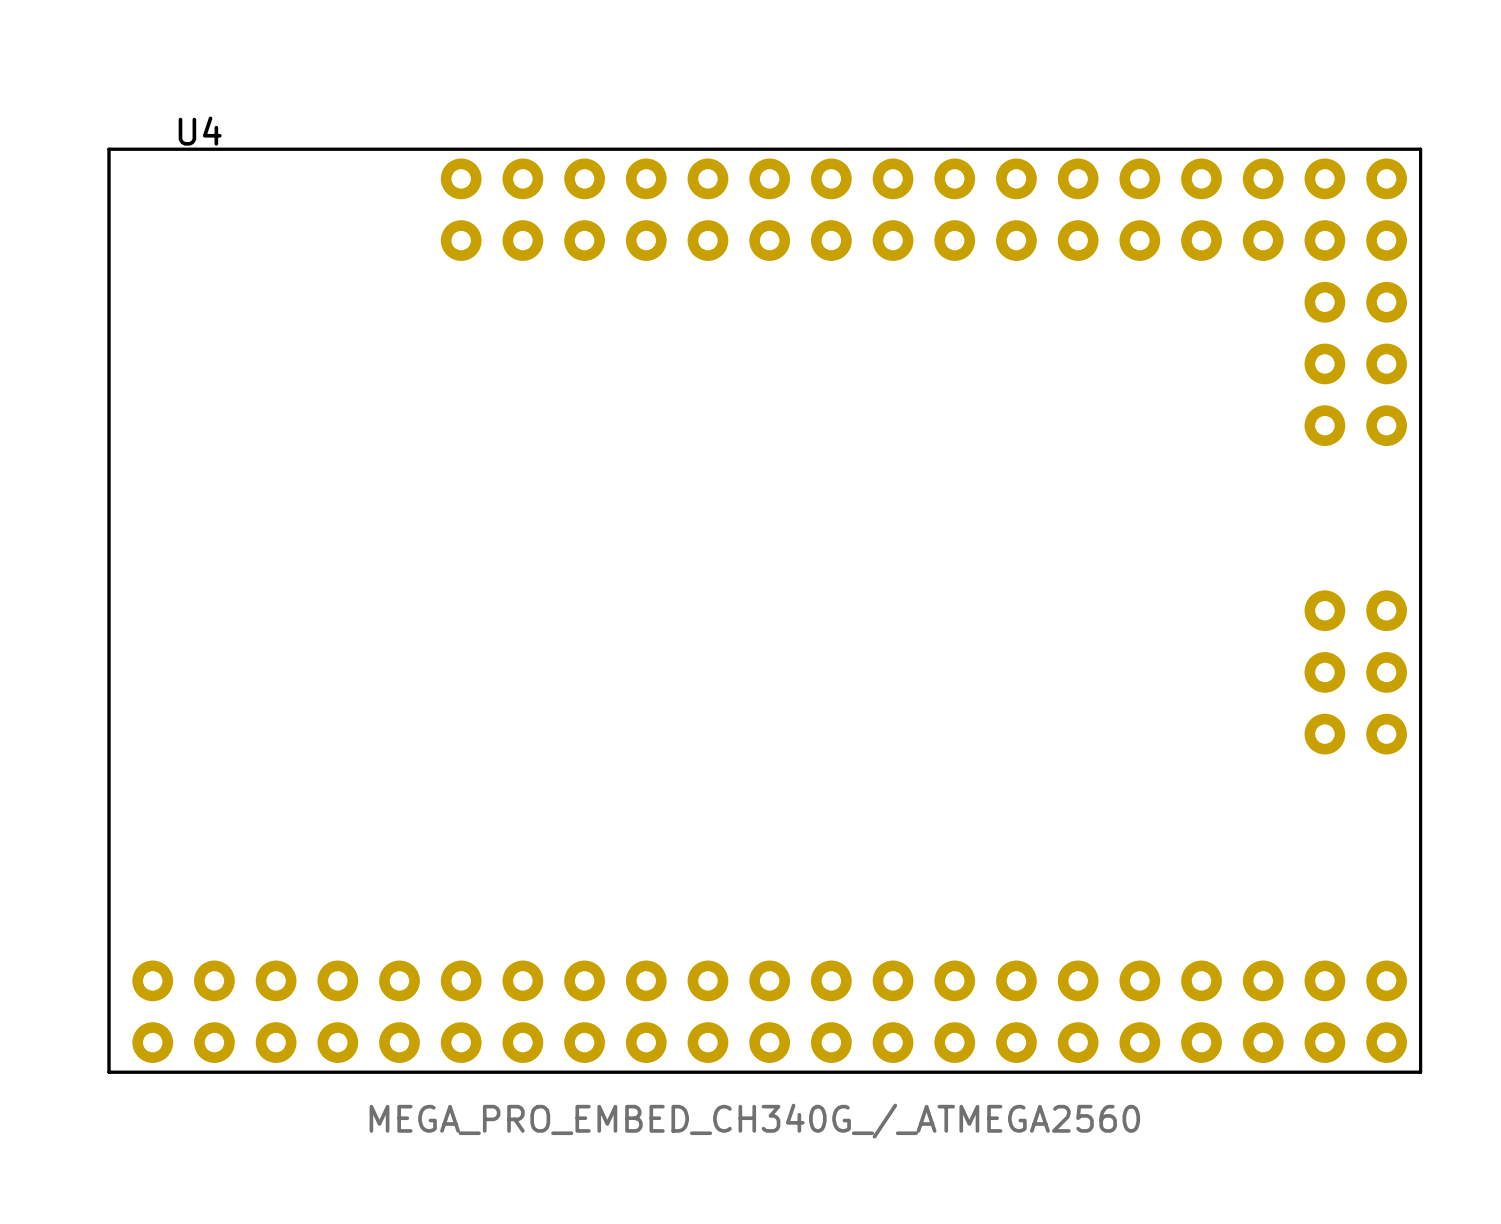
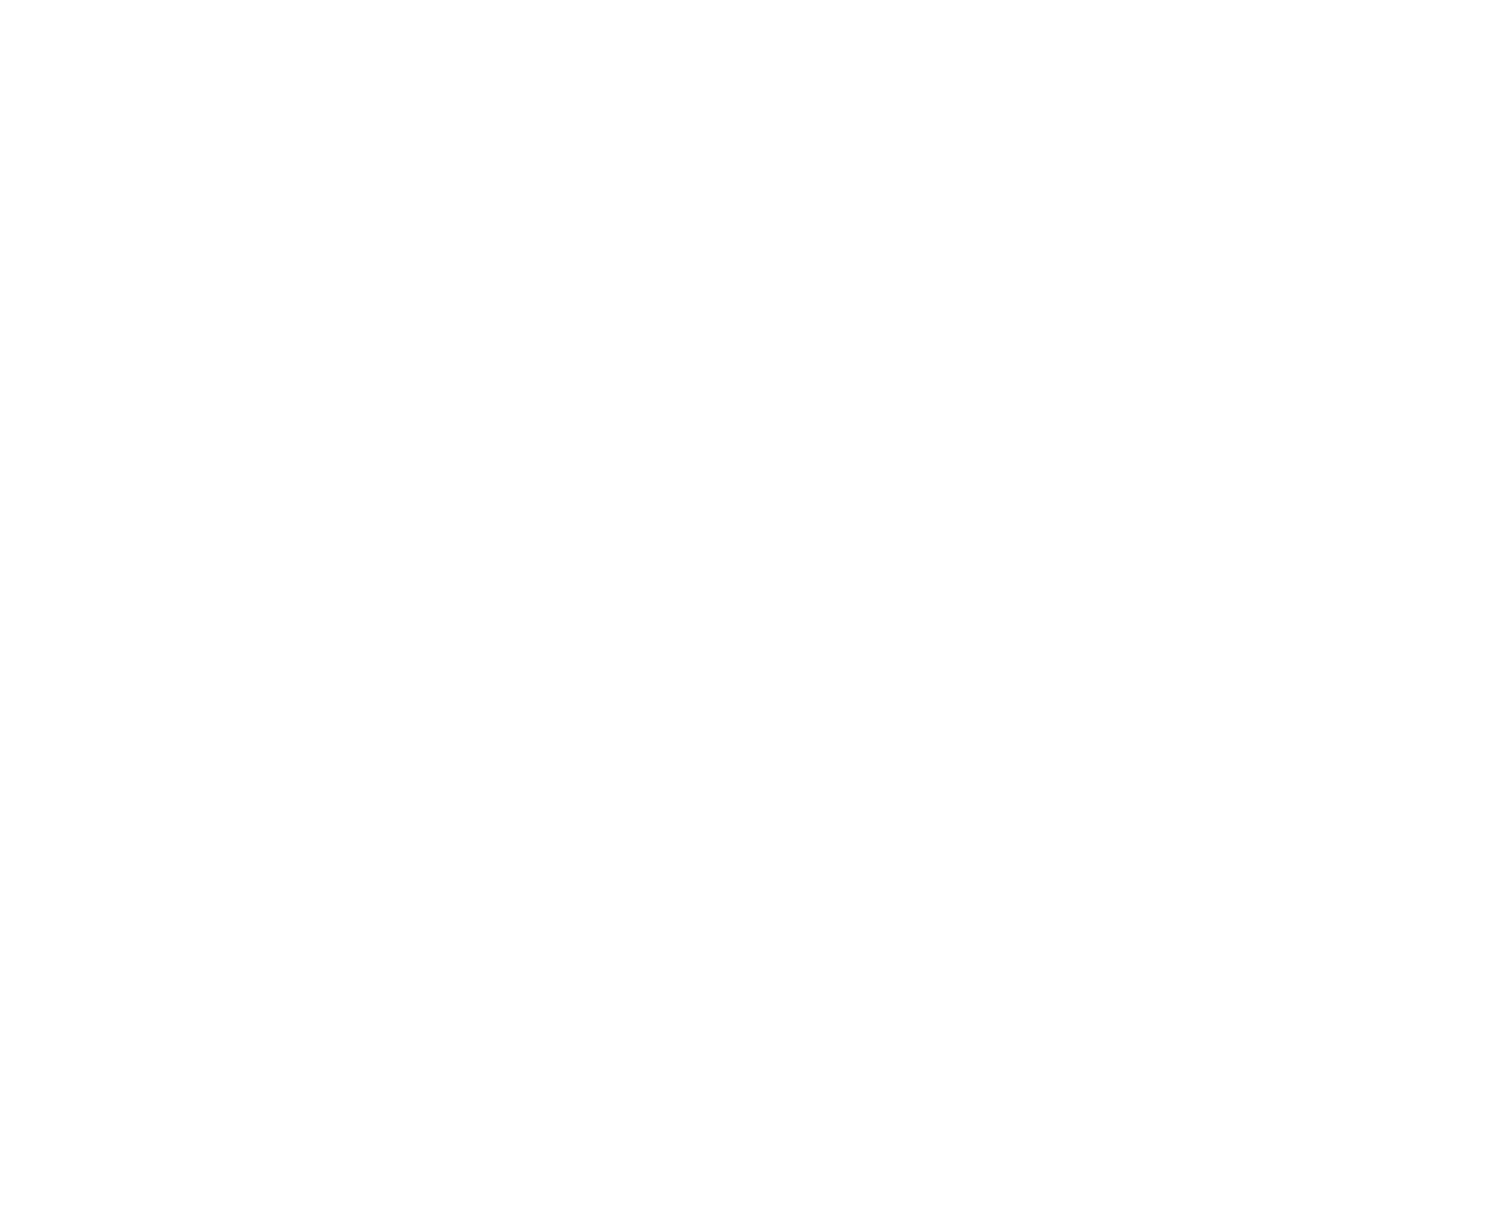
U4: MEGA_PRO_EMBED_CH340G_/_ATMEGA2560 (764, 610) -> none

